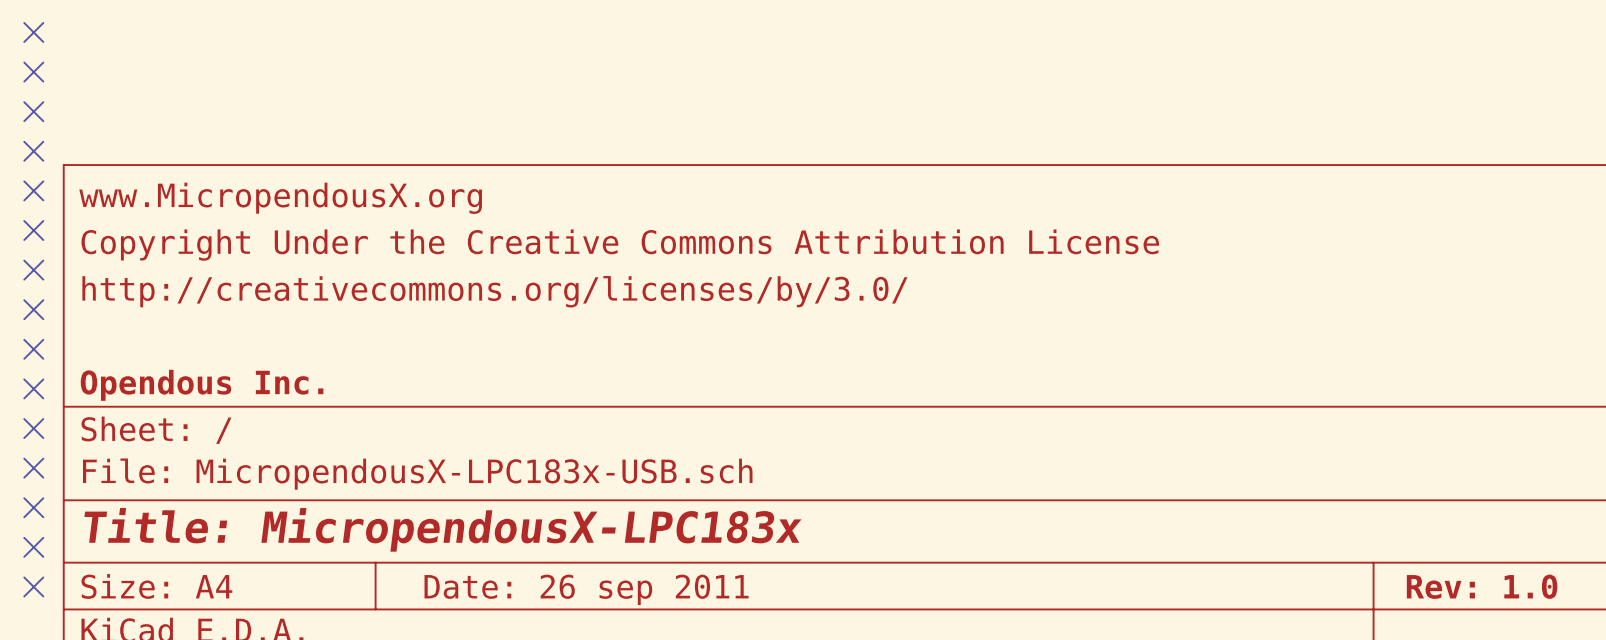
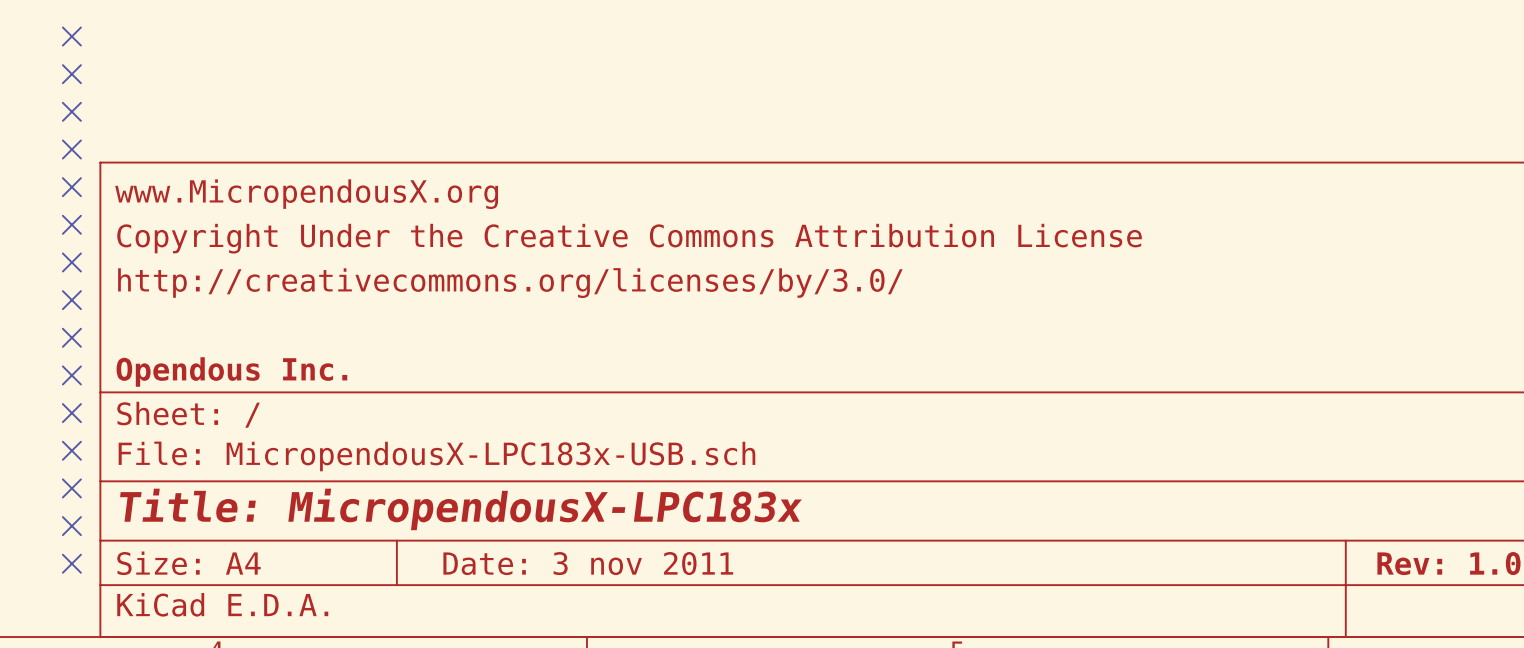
title block: Date: 26 sep 2011 (586, 589) -> Date: 3 nov 2011 (588, 563)

